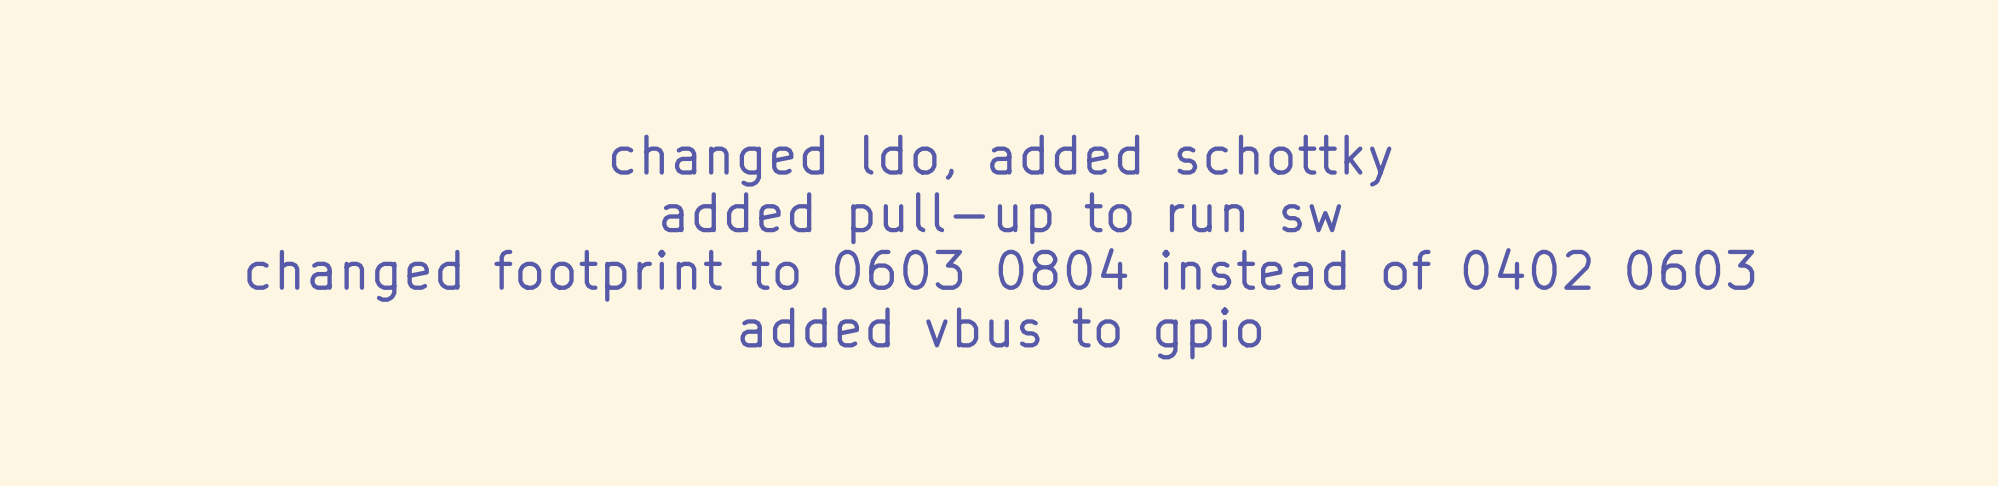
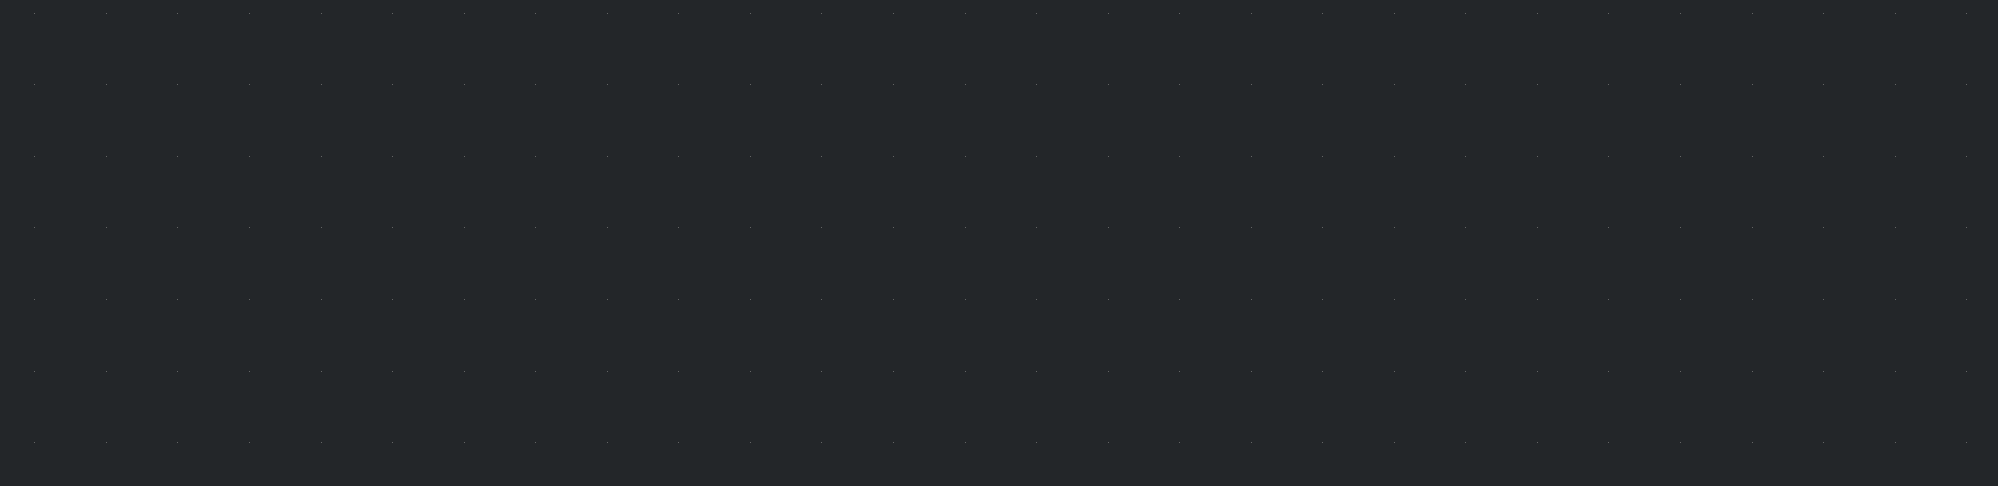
text: changed ldo, added schottky (1001, 160) -> none
text: added pull-up to run sw (1001, 218) -> none
text: changed footprint to 0603 0804 instead of 0402 0603 (1000, 274) -> none
text: added vbus to gpio (1000, 333) -> none

